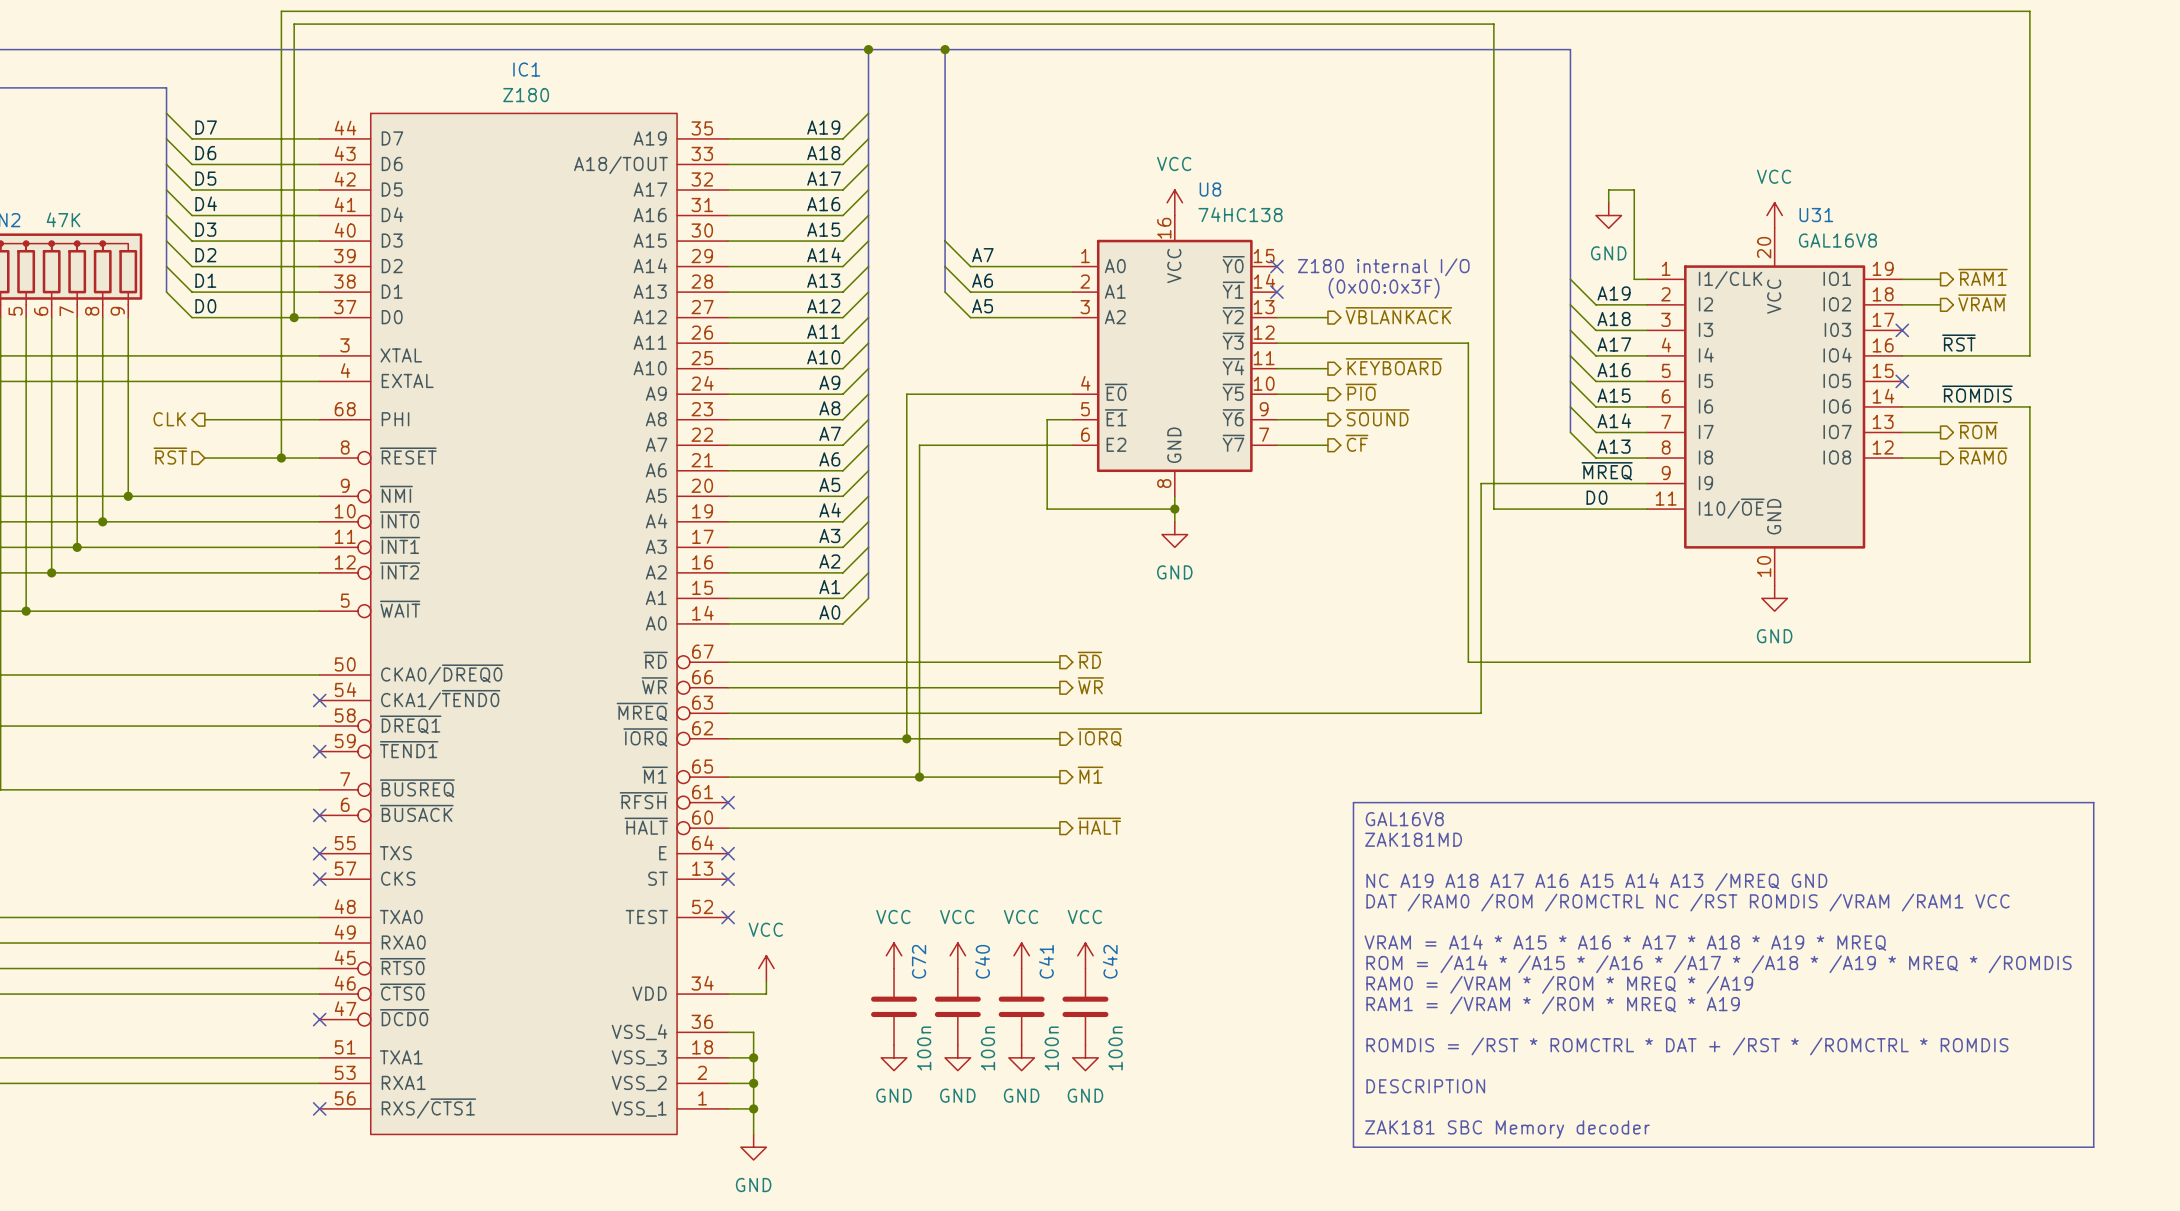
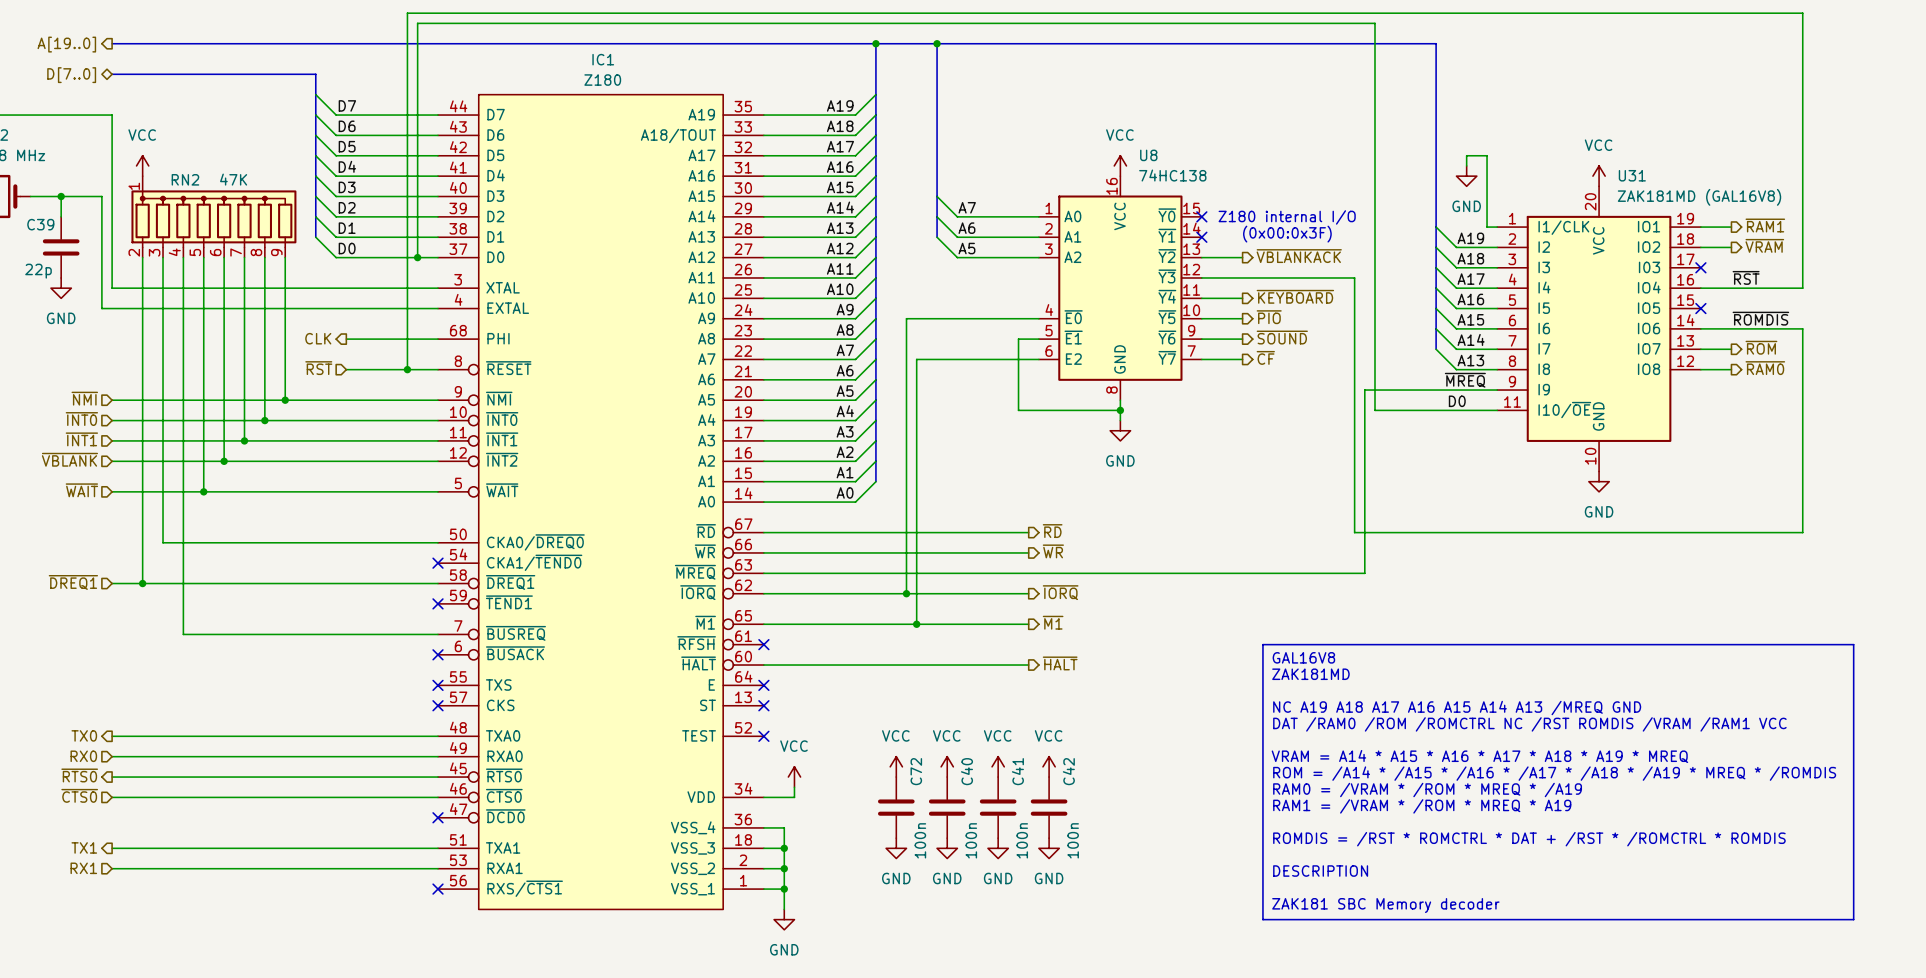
U31 value: GAL16V8 (1837, 240) -> ZAK181MD (GAL16V8) (1699, 197)

